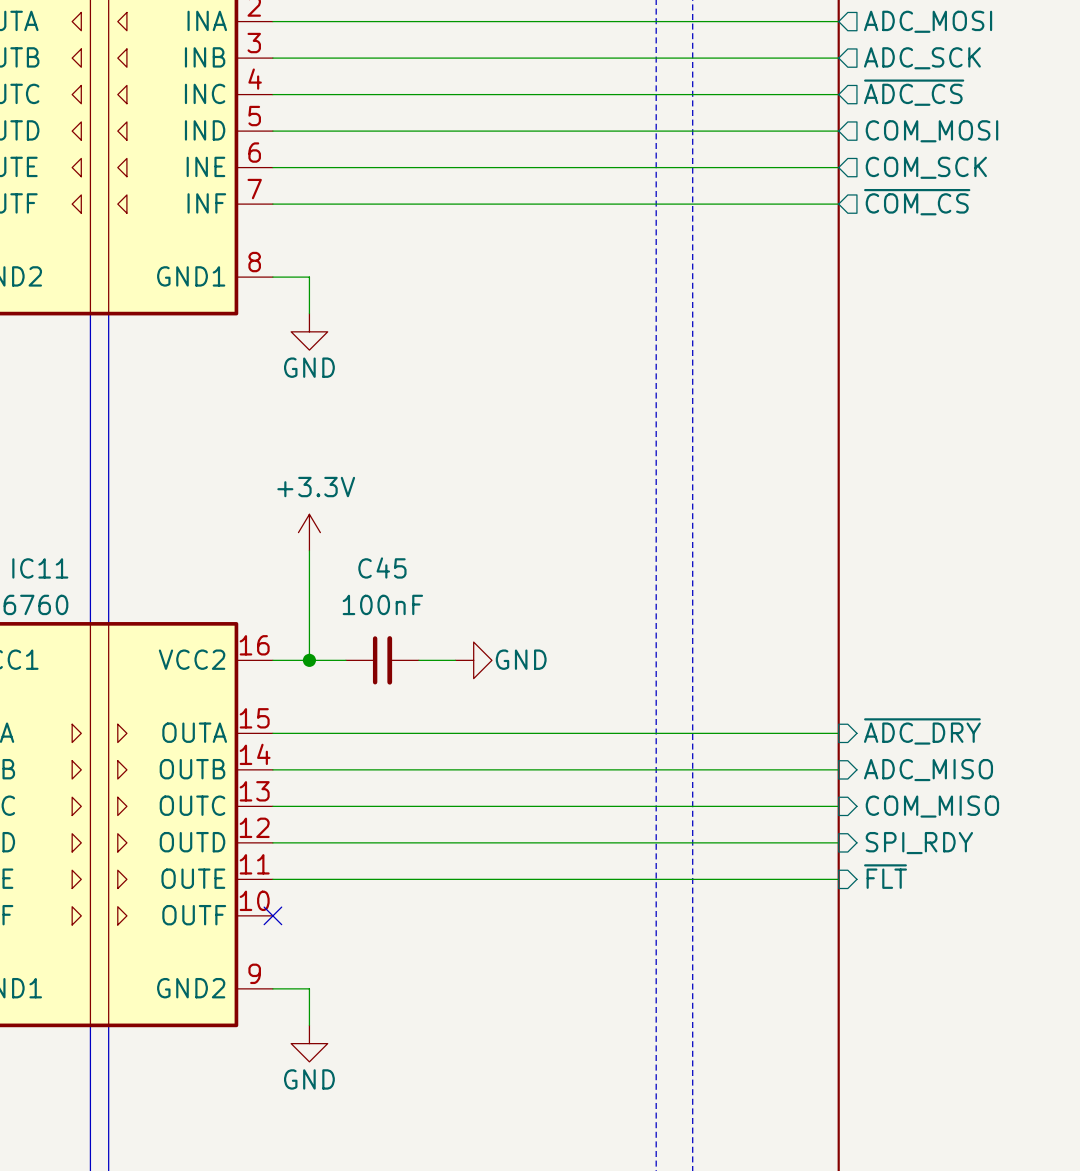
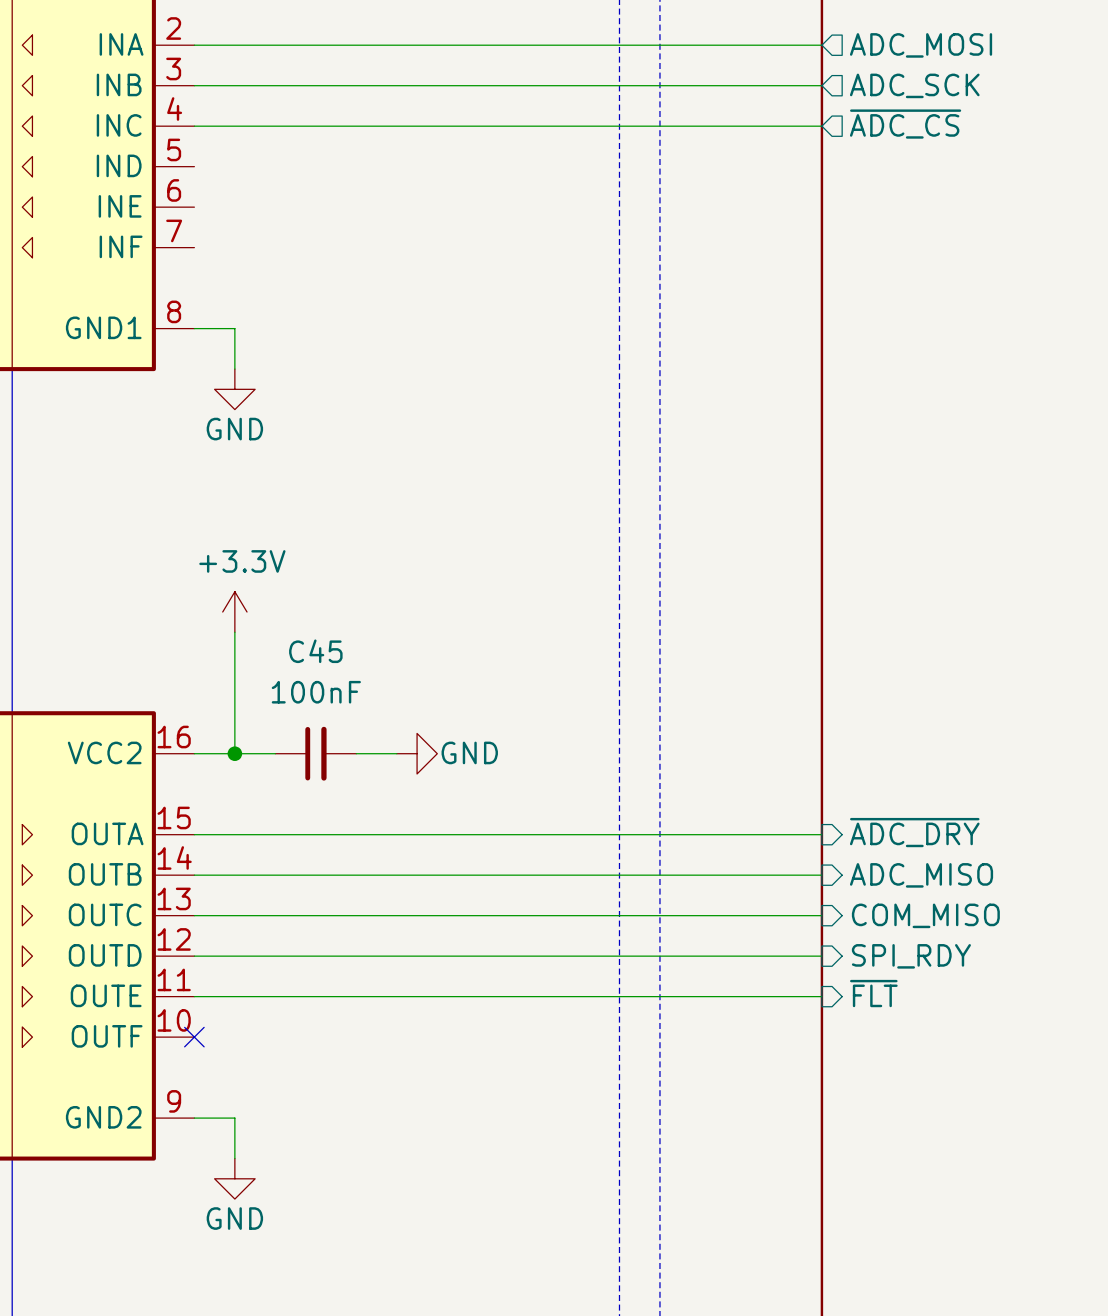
wire: (272, 131) (838, 131) -> none
sheet pin: COM_MOSI (931, 131) -> none
wire: (272, 167) (838, 167) -> none
sheet pin: COM_SCK (926, 167) -> none
sheet pin: ~{COM_CS} (917, 202) -> none
wire: (272, 204) (838, 204) -> none

